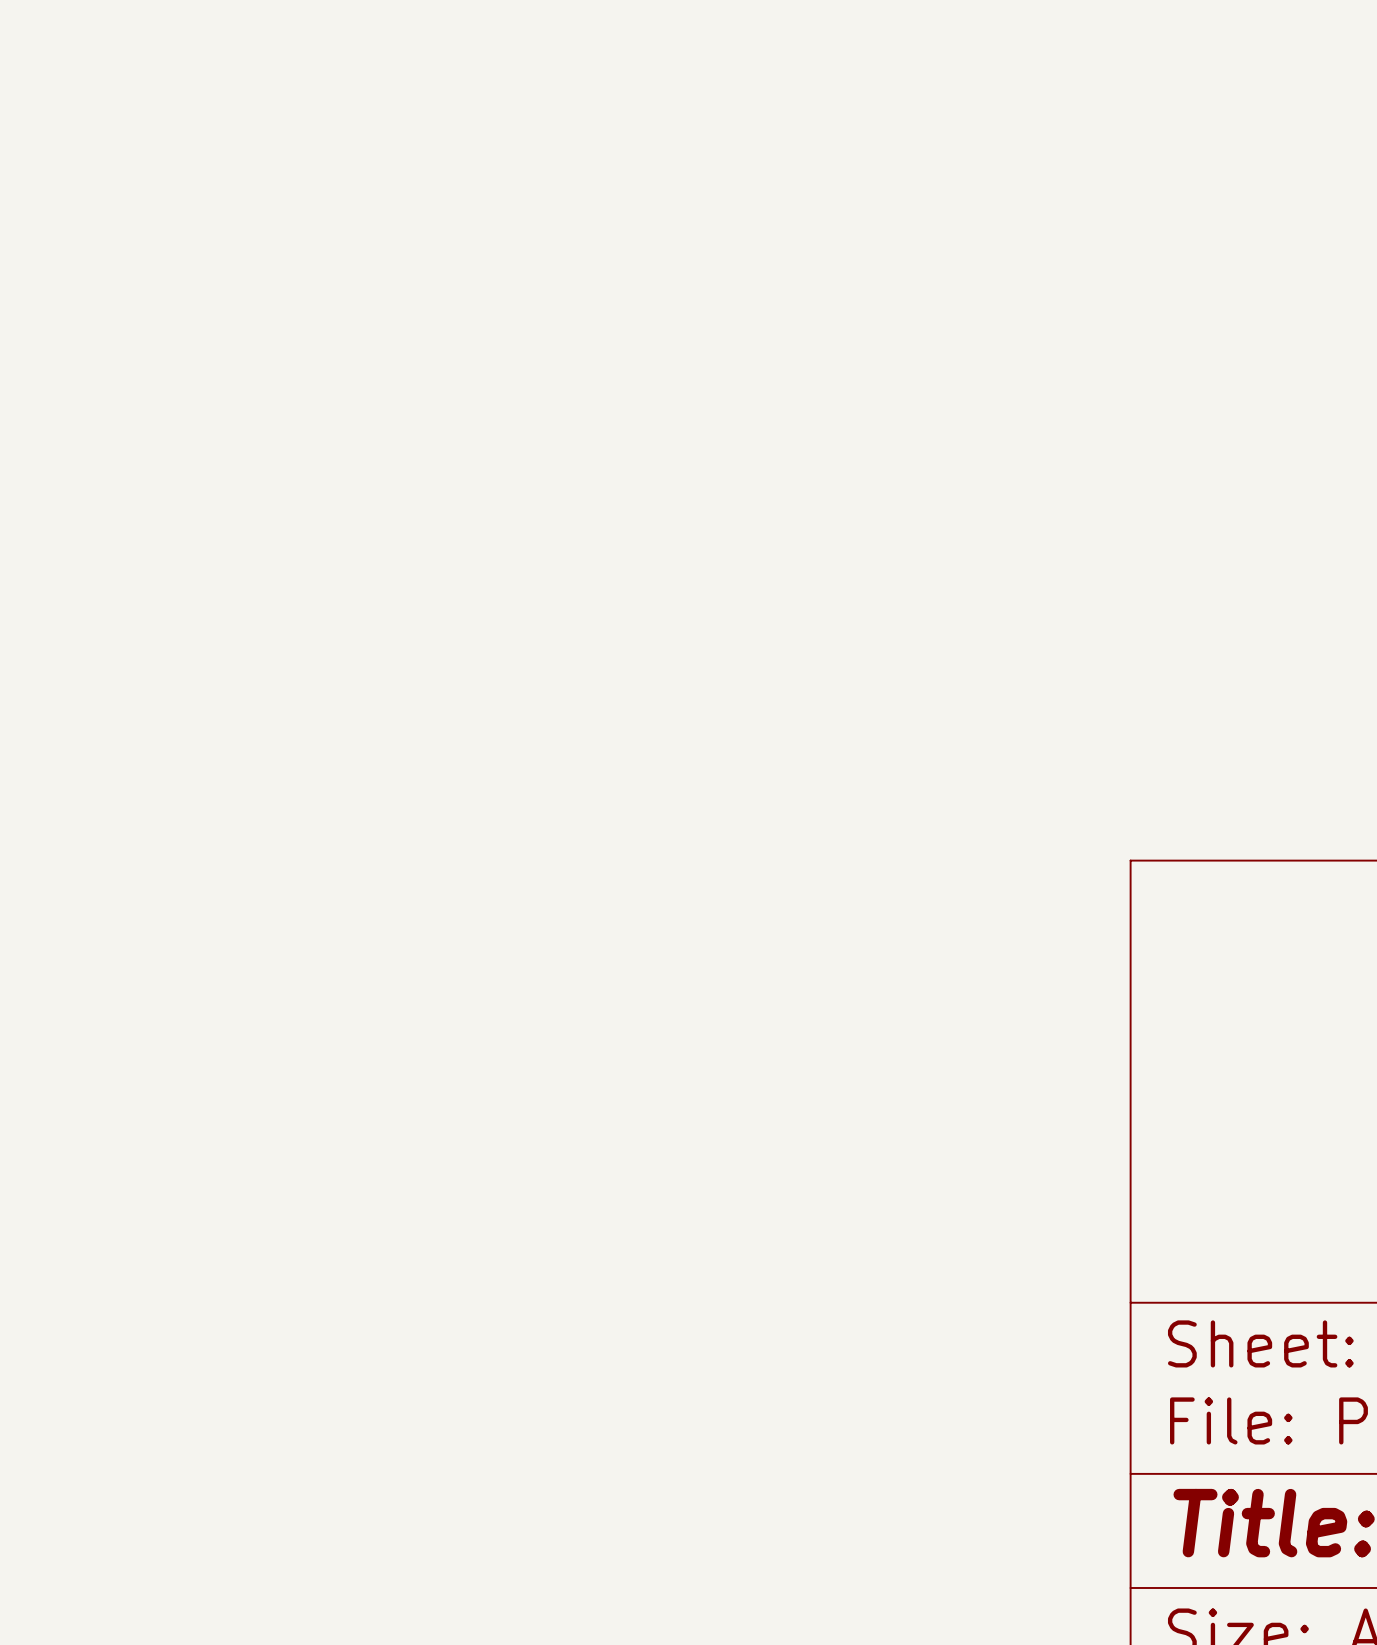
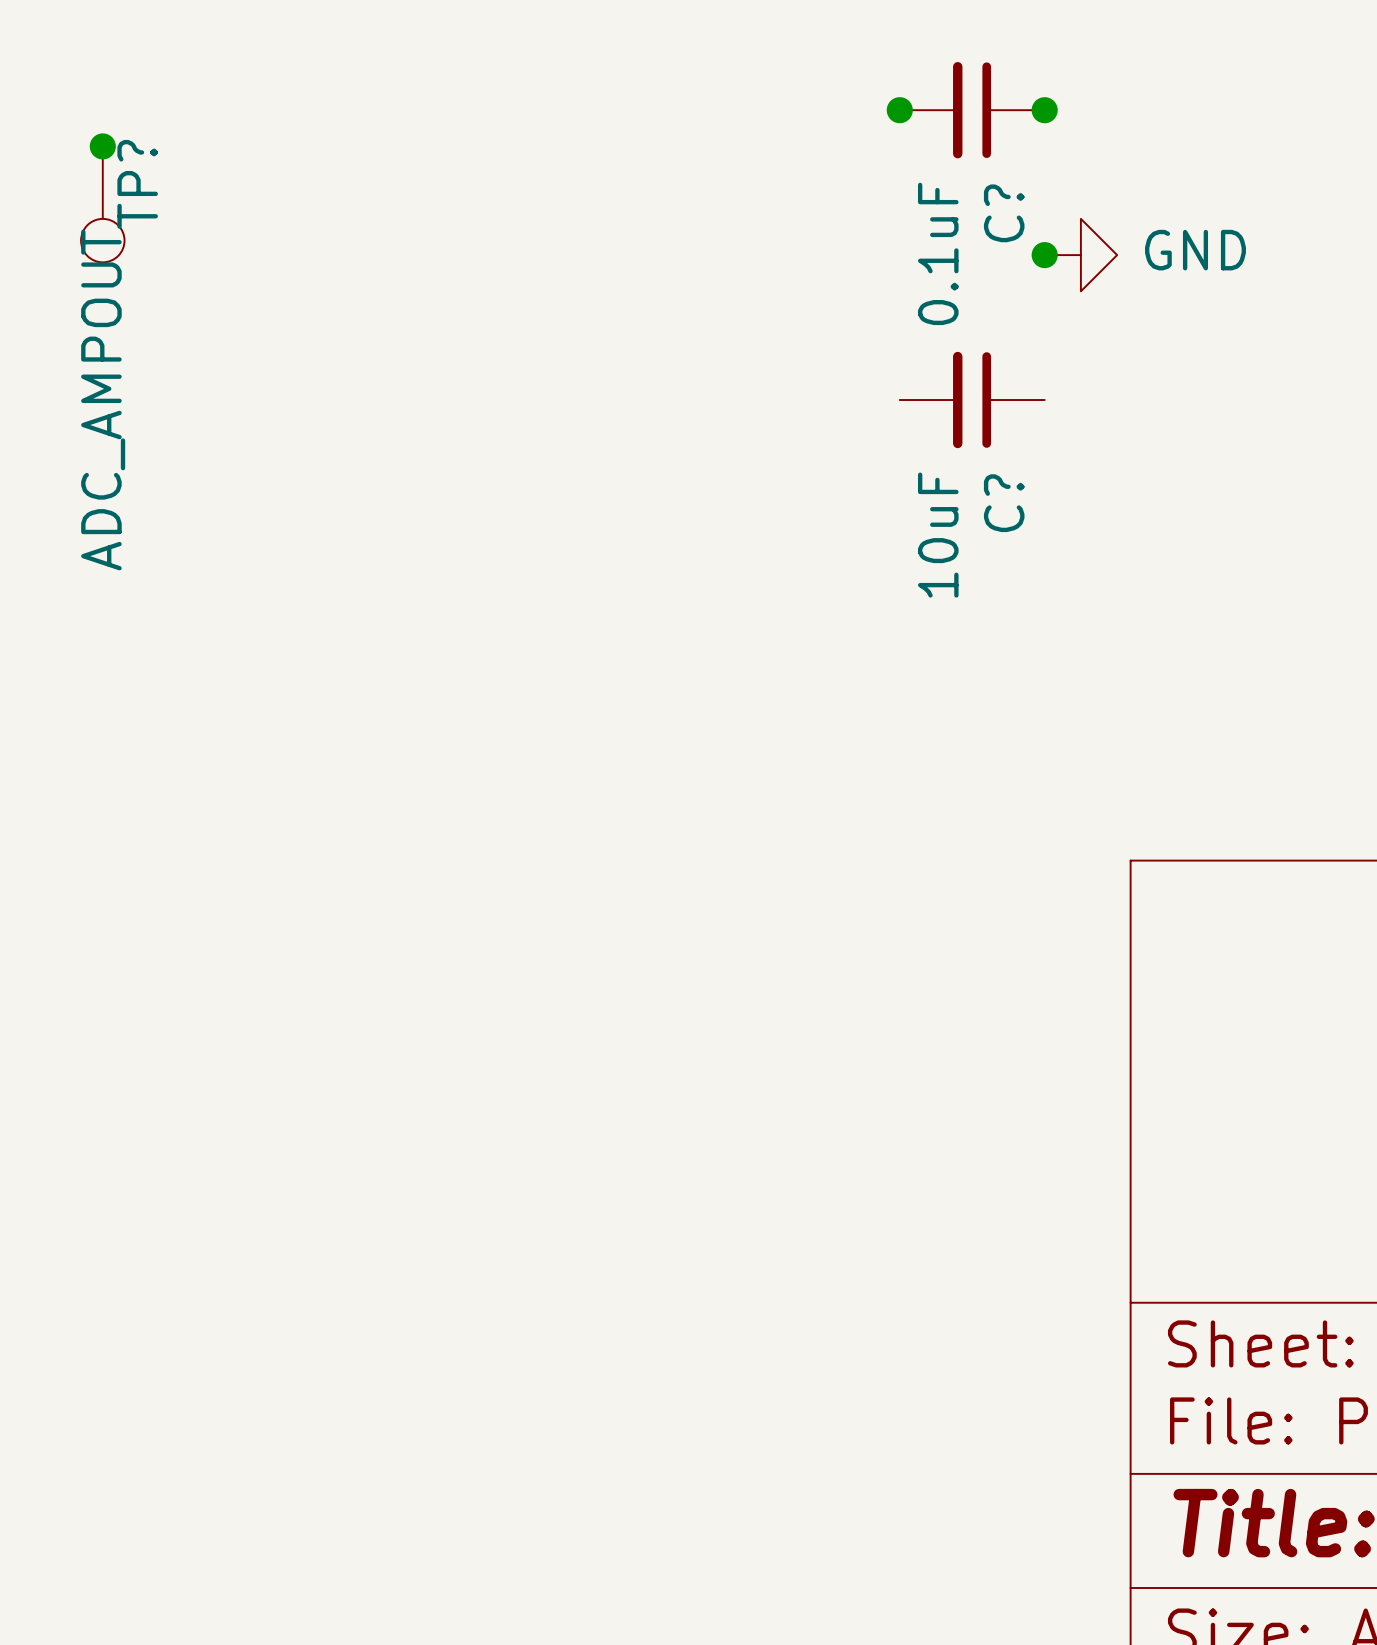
junction: none -> (899, 110)
C?: none -> 0.1uF (972, 110)
junction: none -> (1044, 110)
junction: none -> (102, 146)
TP?: none -> ADC_AMPOUT (102, 204)
junction: none -> (1044, 255)
power symbol: none -> GND (1080, 255)
C?: none -> 10uF (972, 400)

